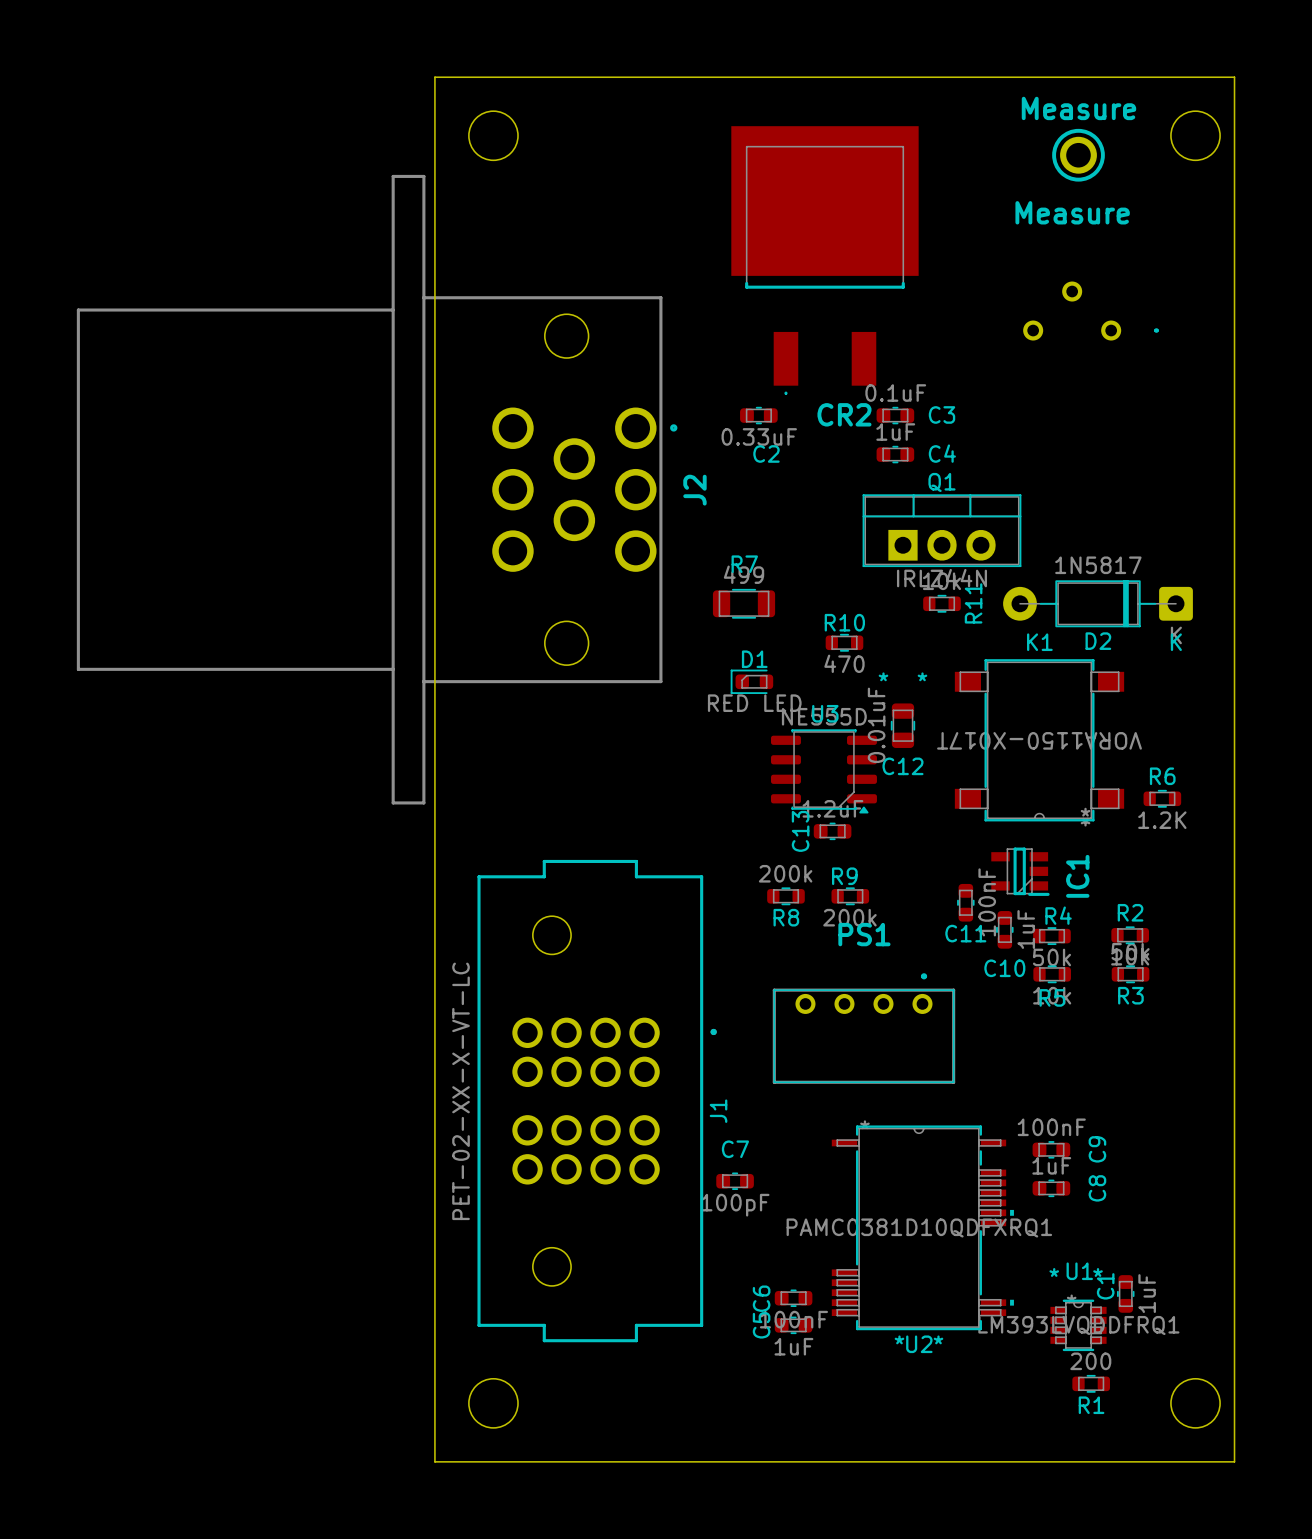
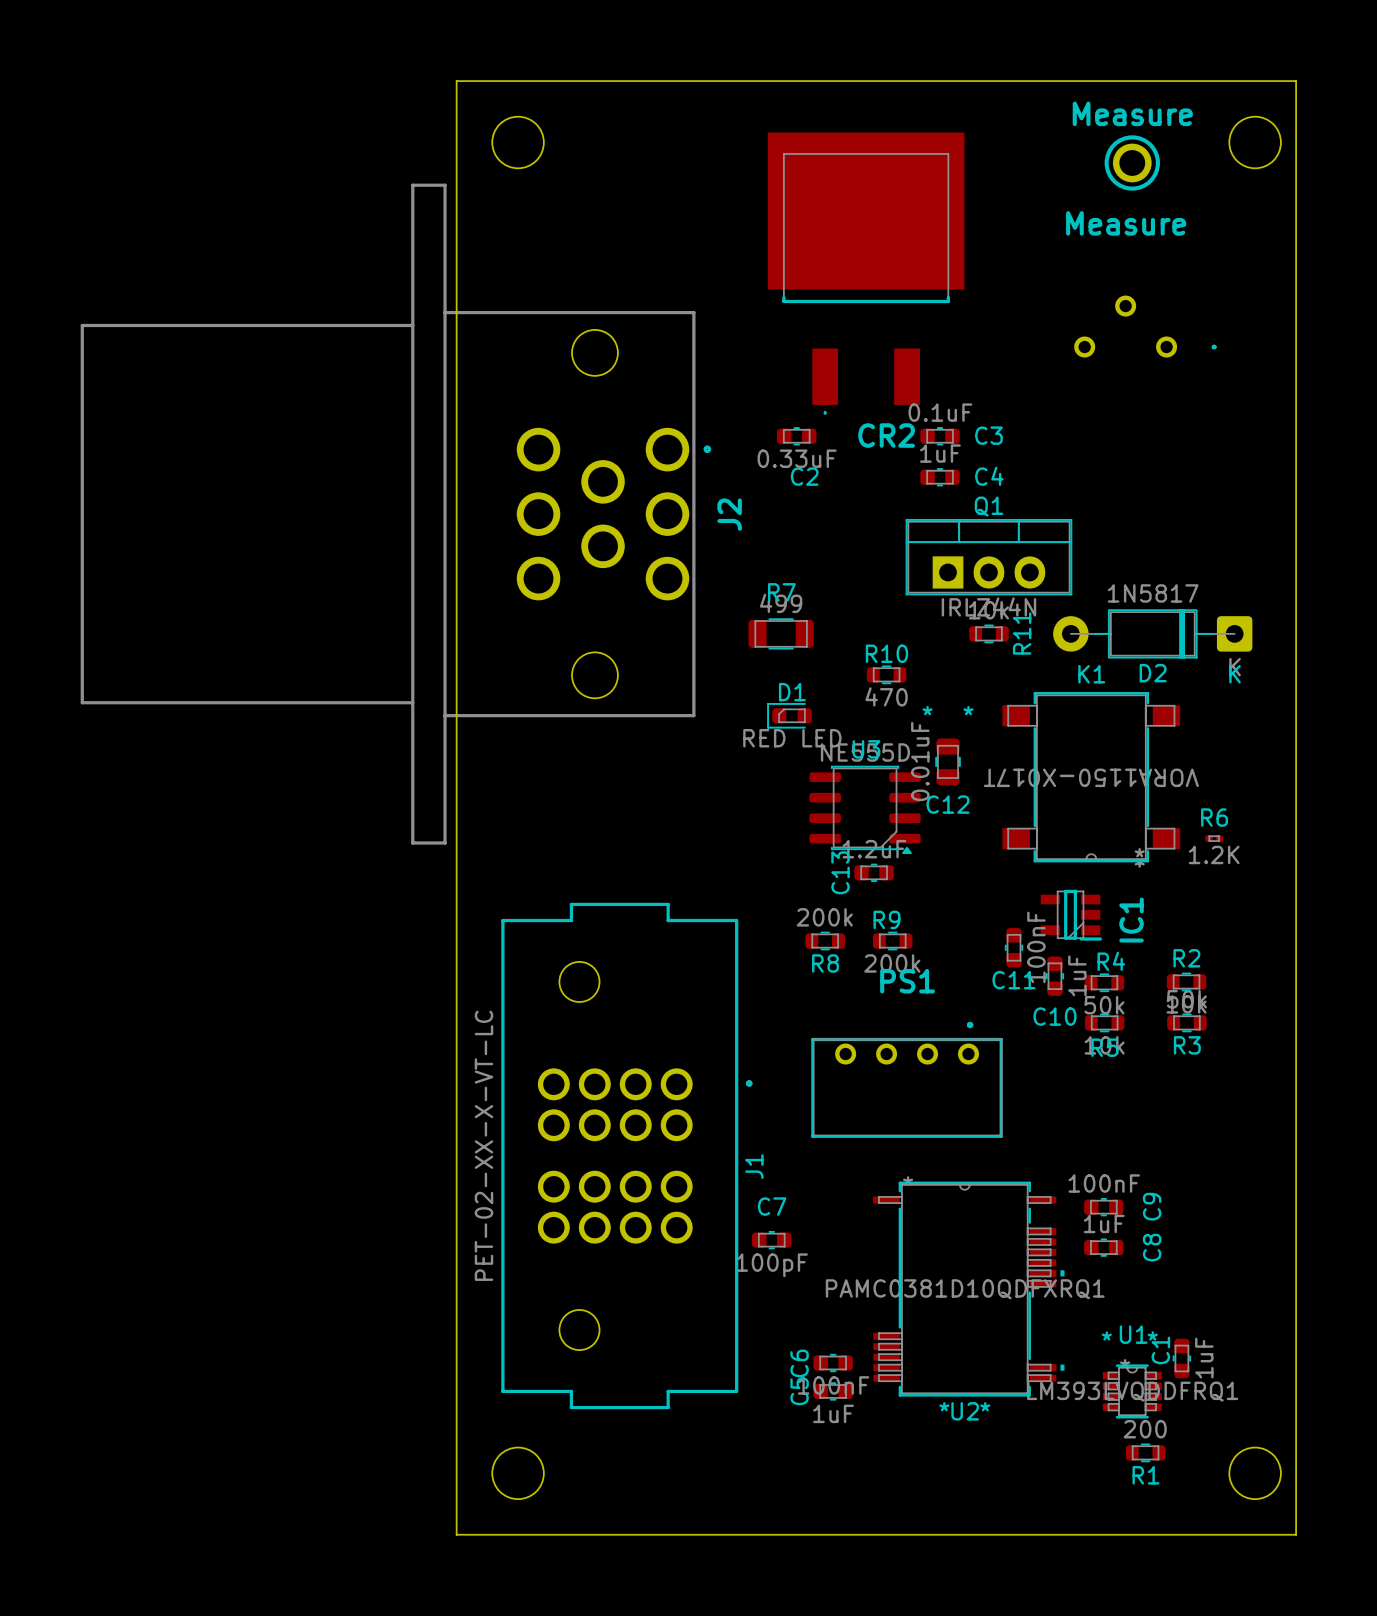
R6 footprint: [1143, 789, 1182, 808] -> [1205, 835, 1224, 842]

